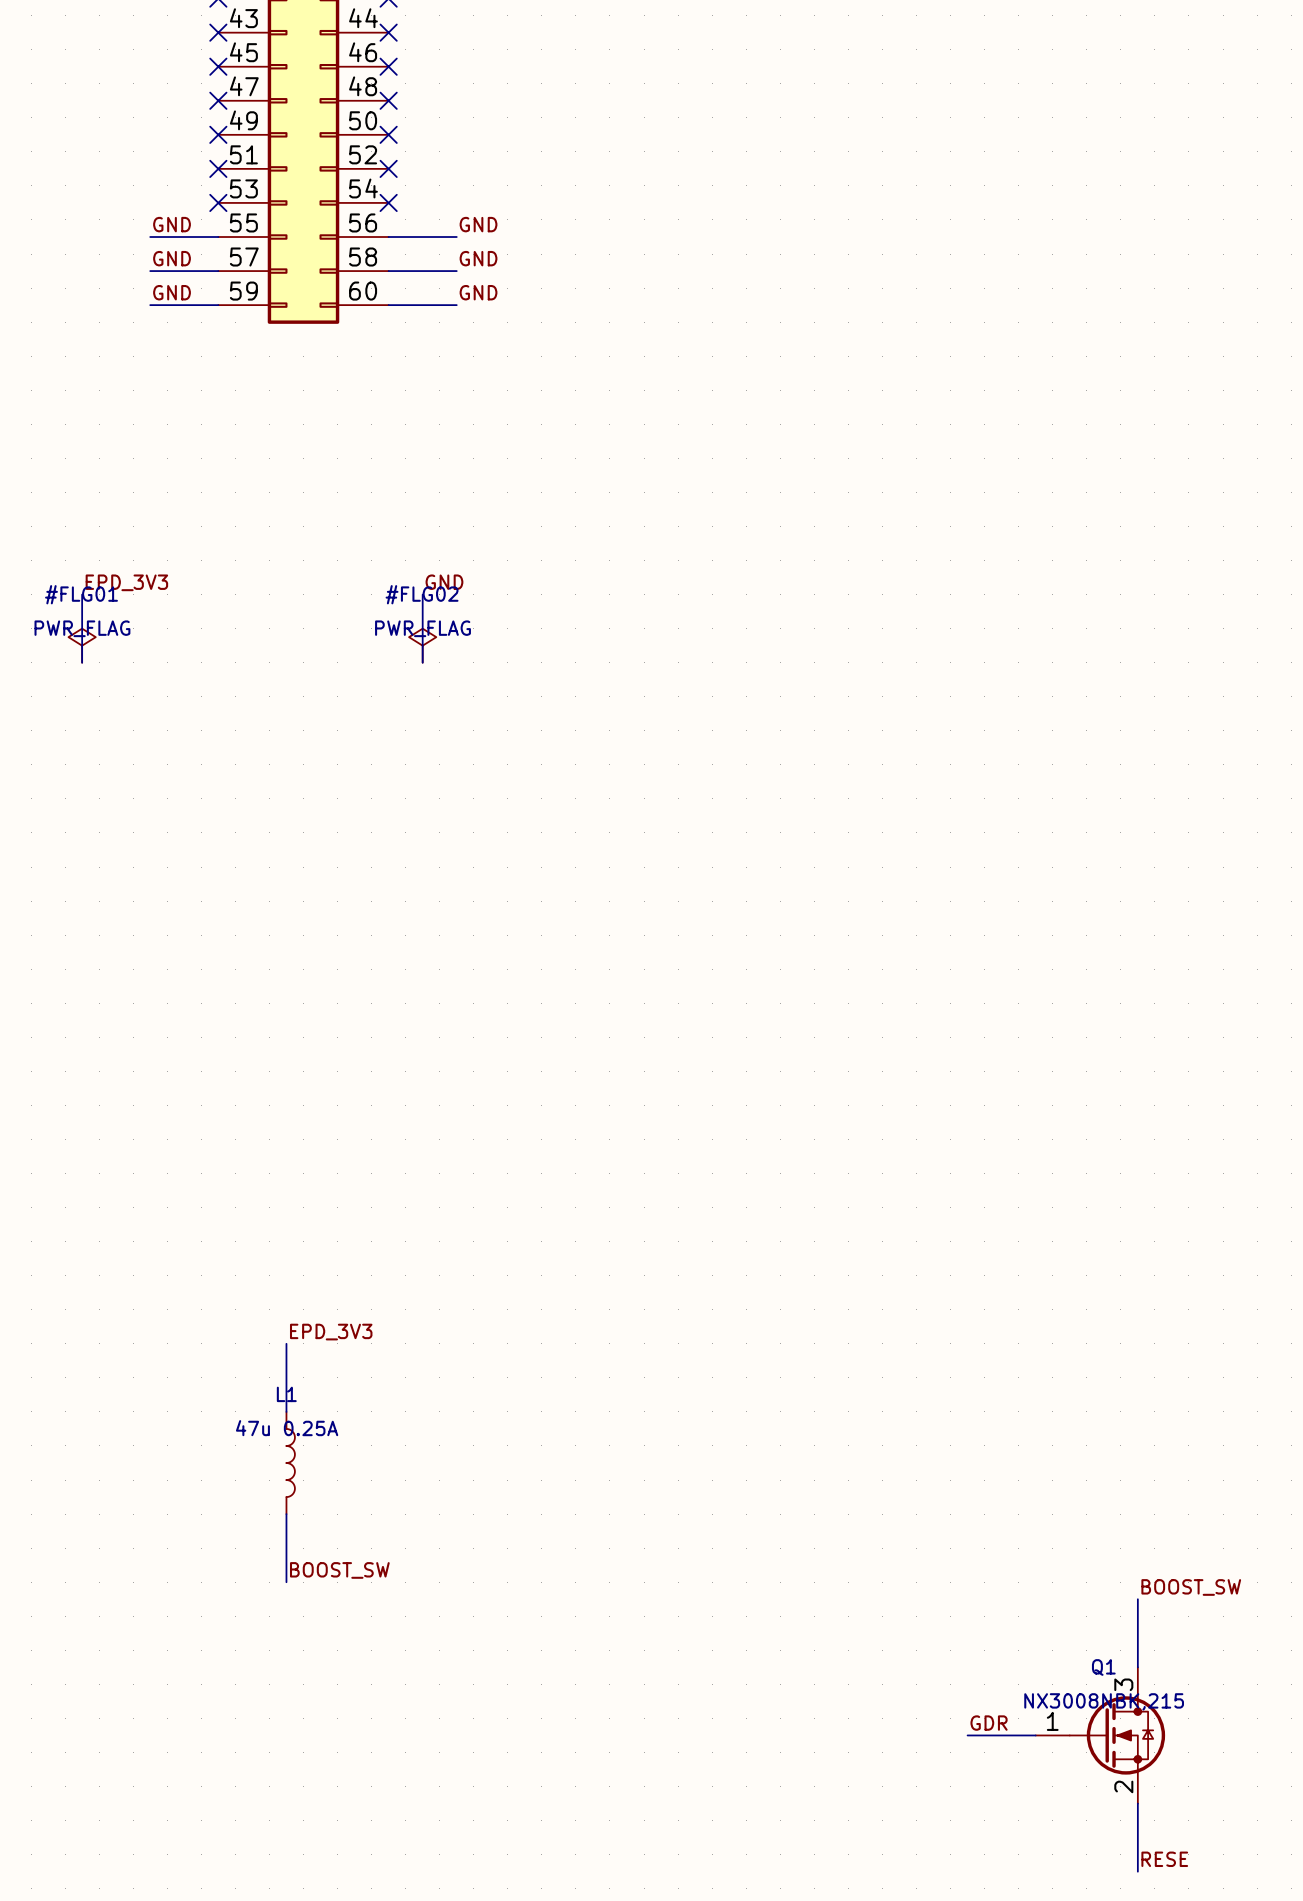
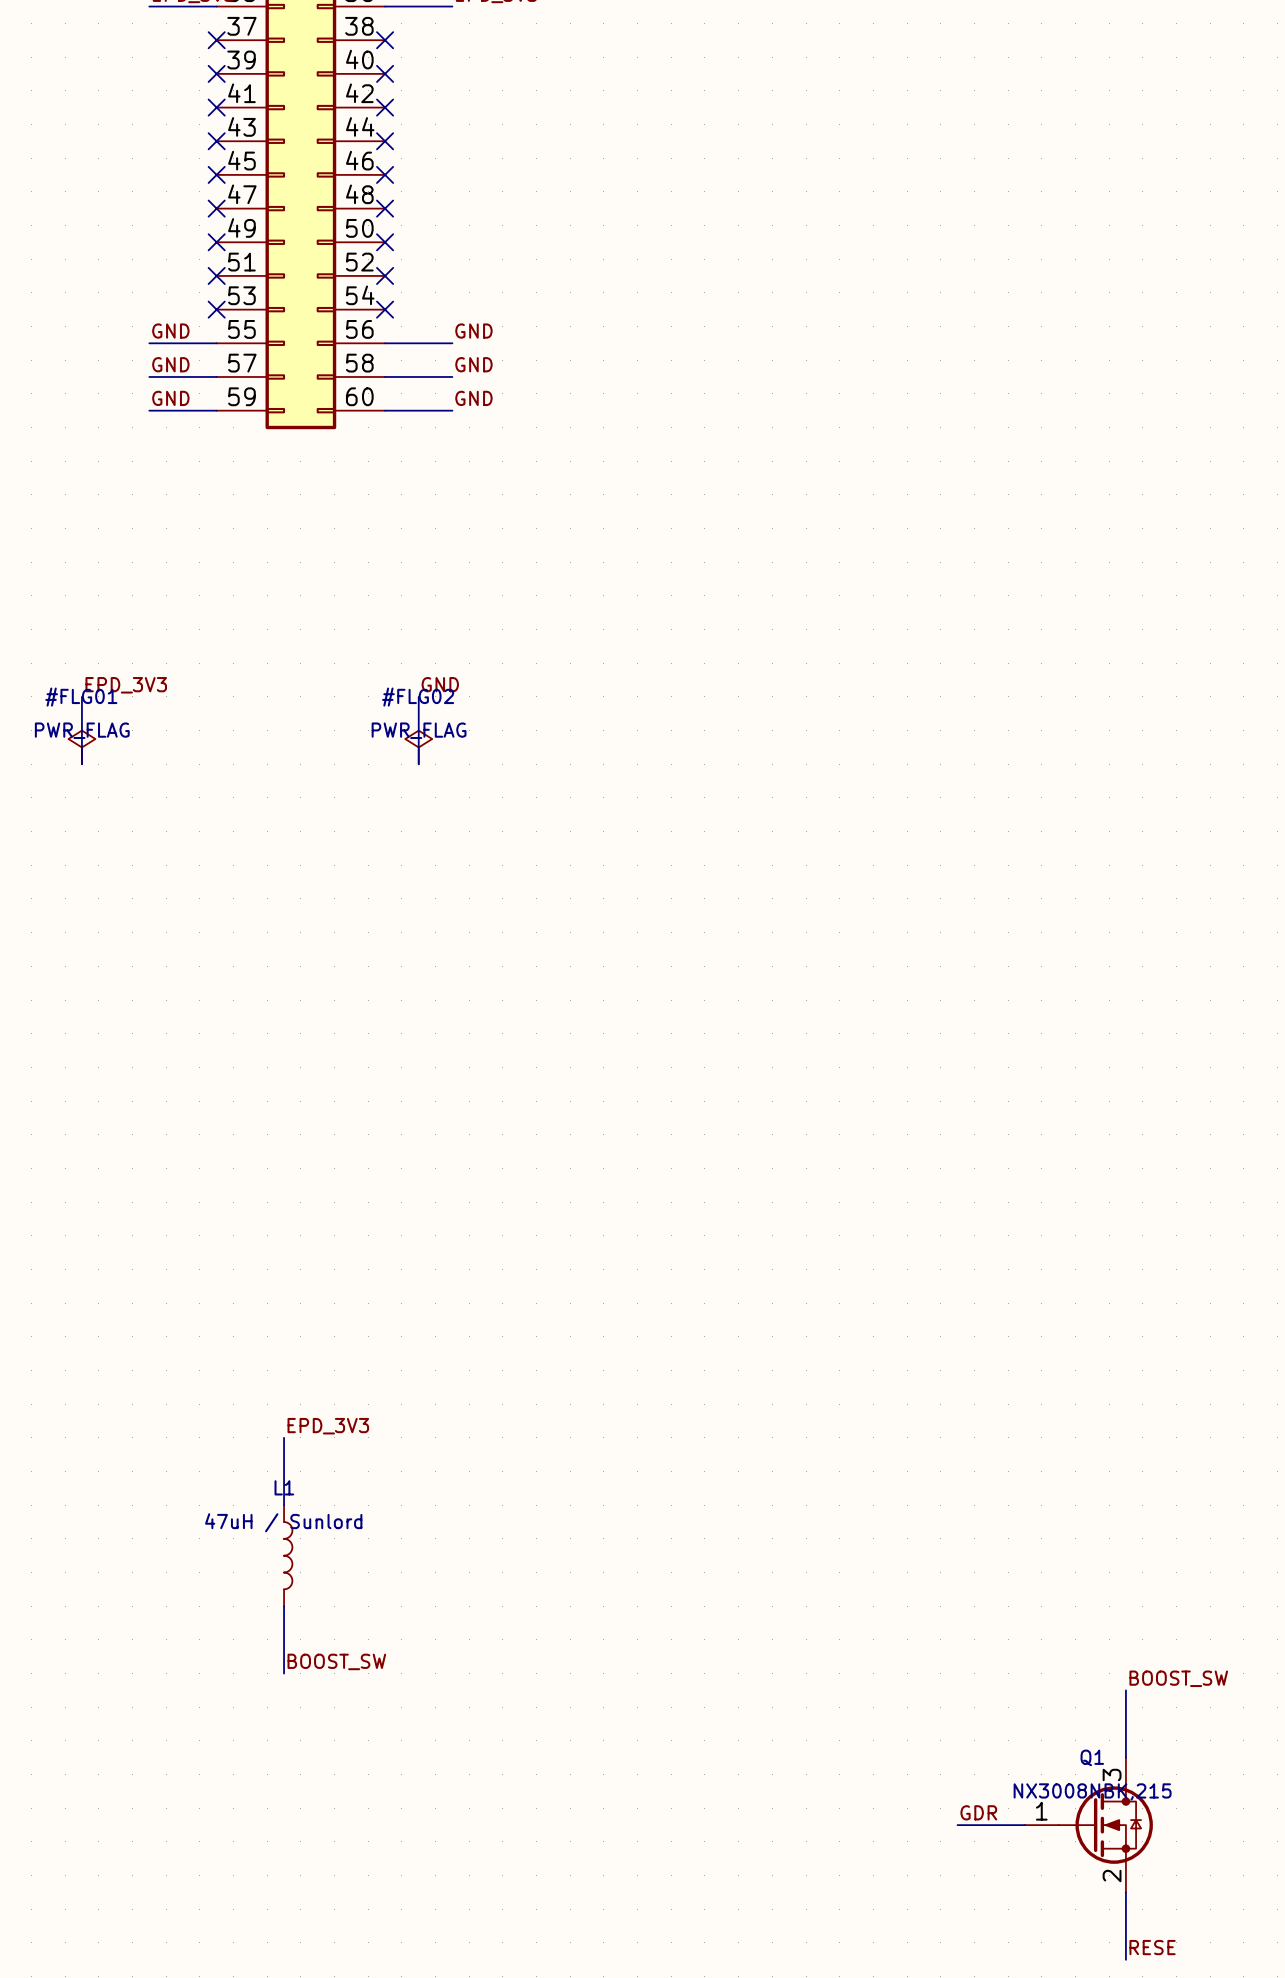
L1 value: 47u 0.25A (287, 1428) -> 47uH / Sunlord (283, 1522)

